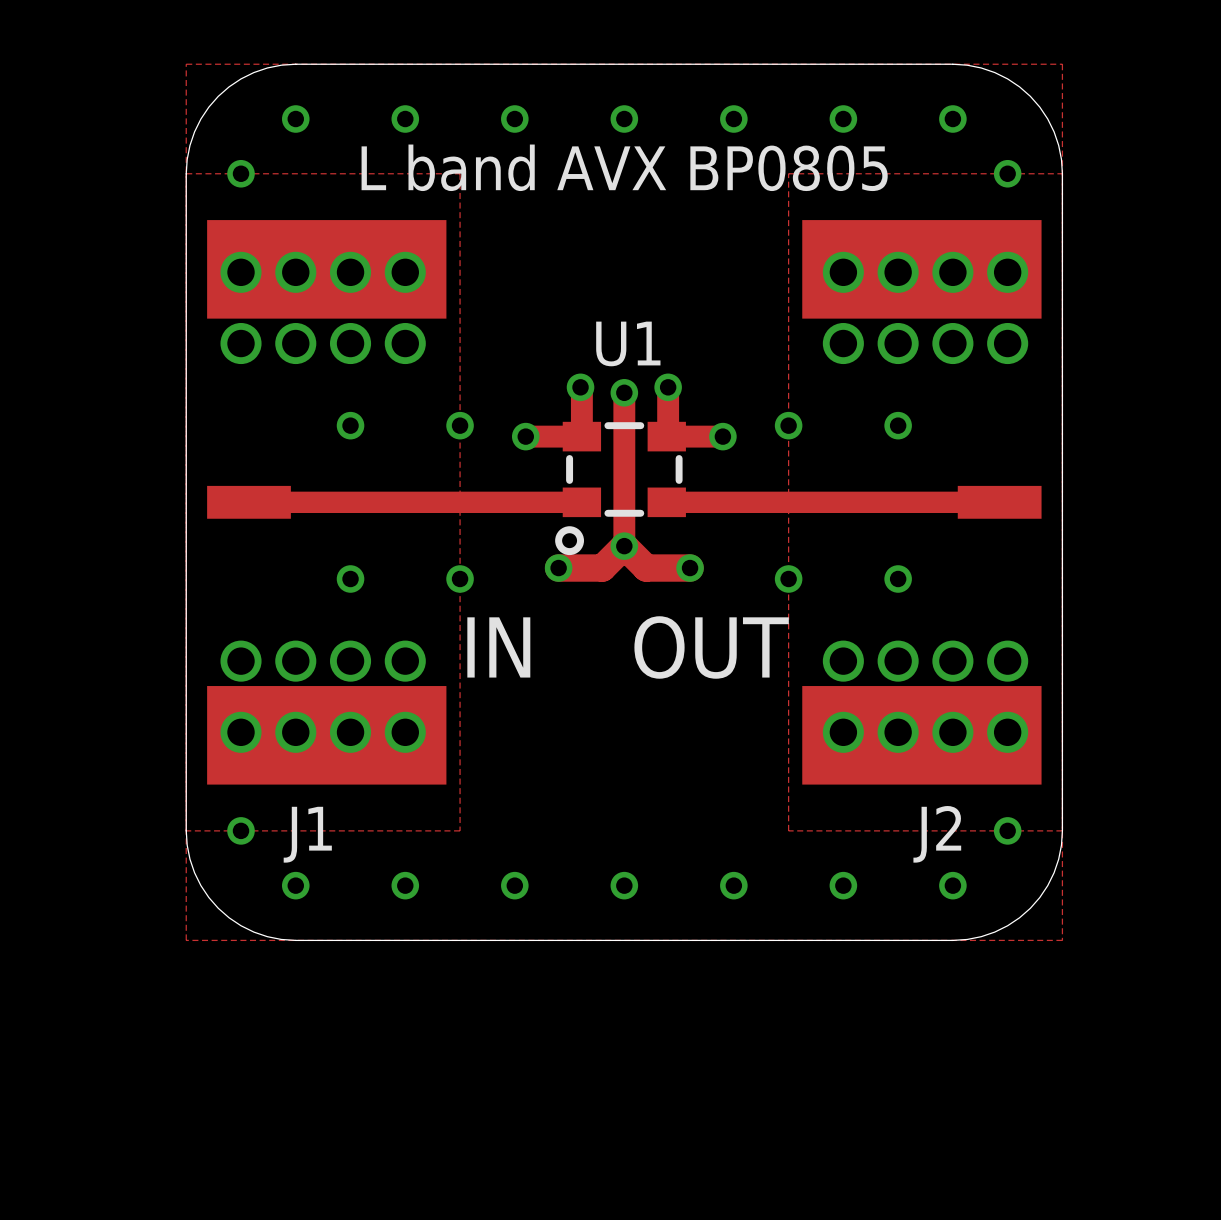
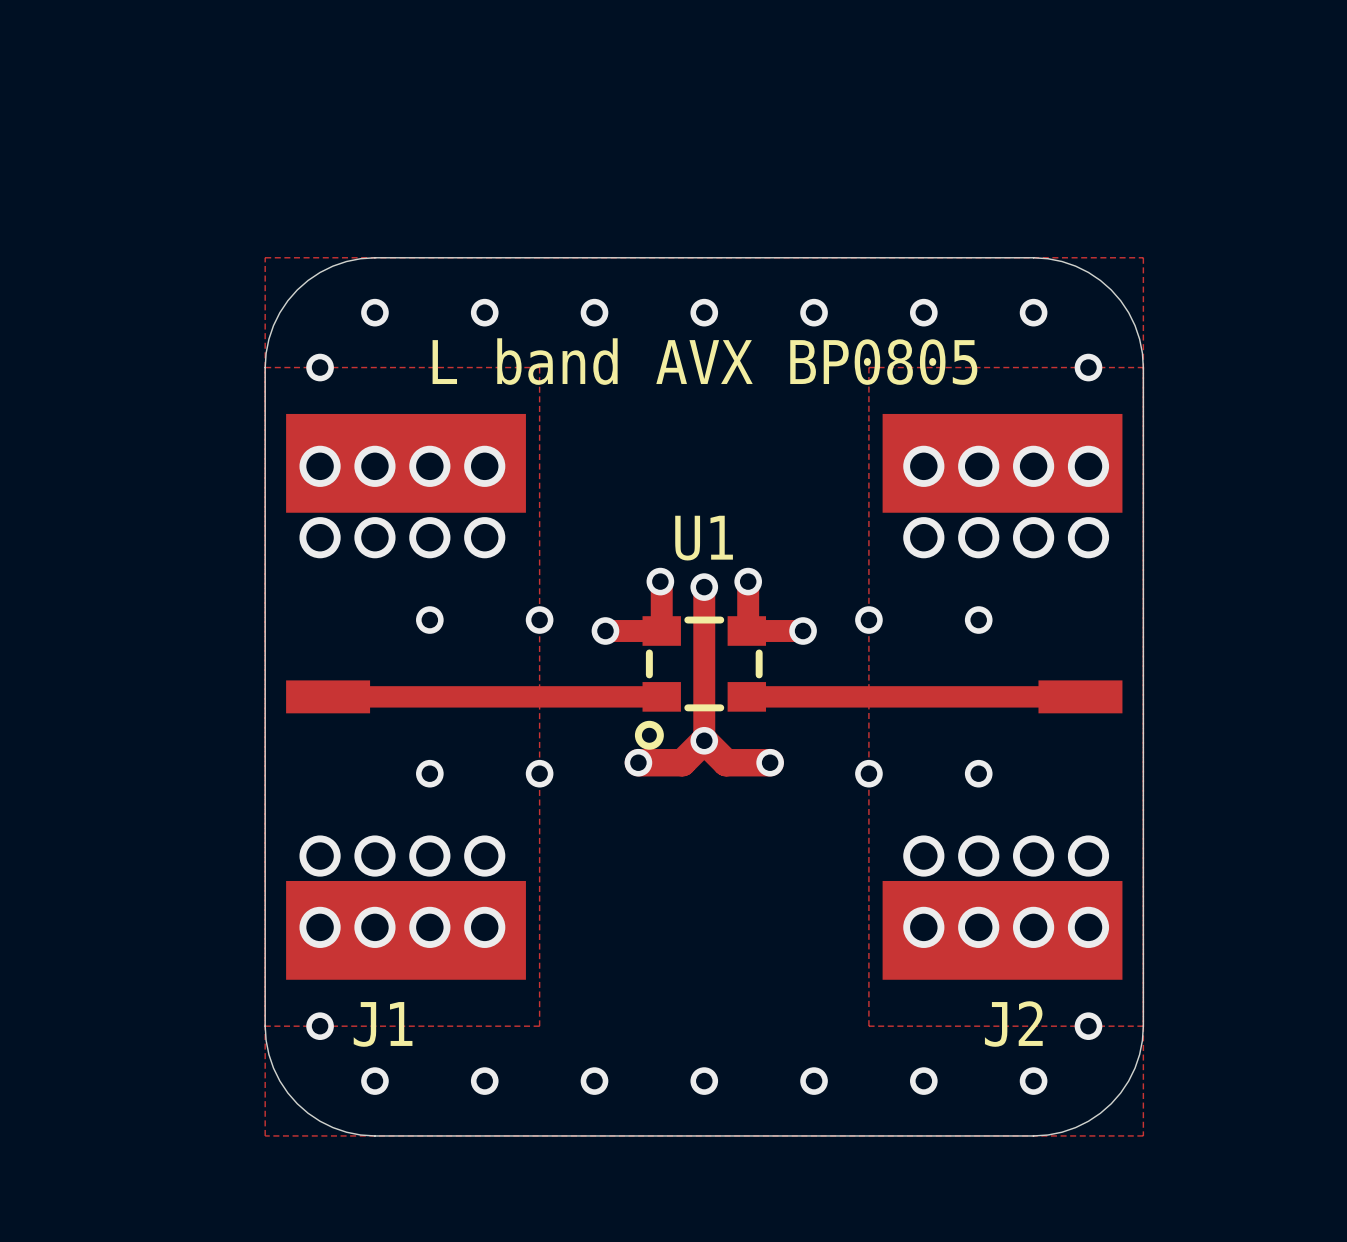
text: IN (498, 647) -> none
text: OUT (711, 647) -> none

